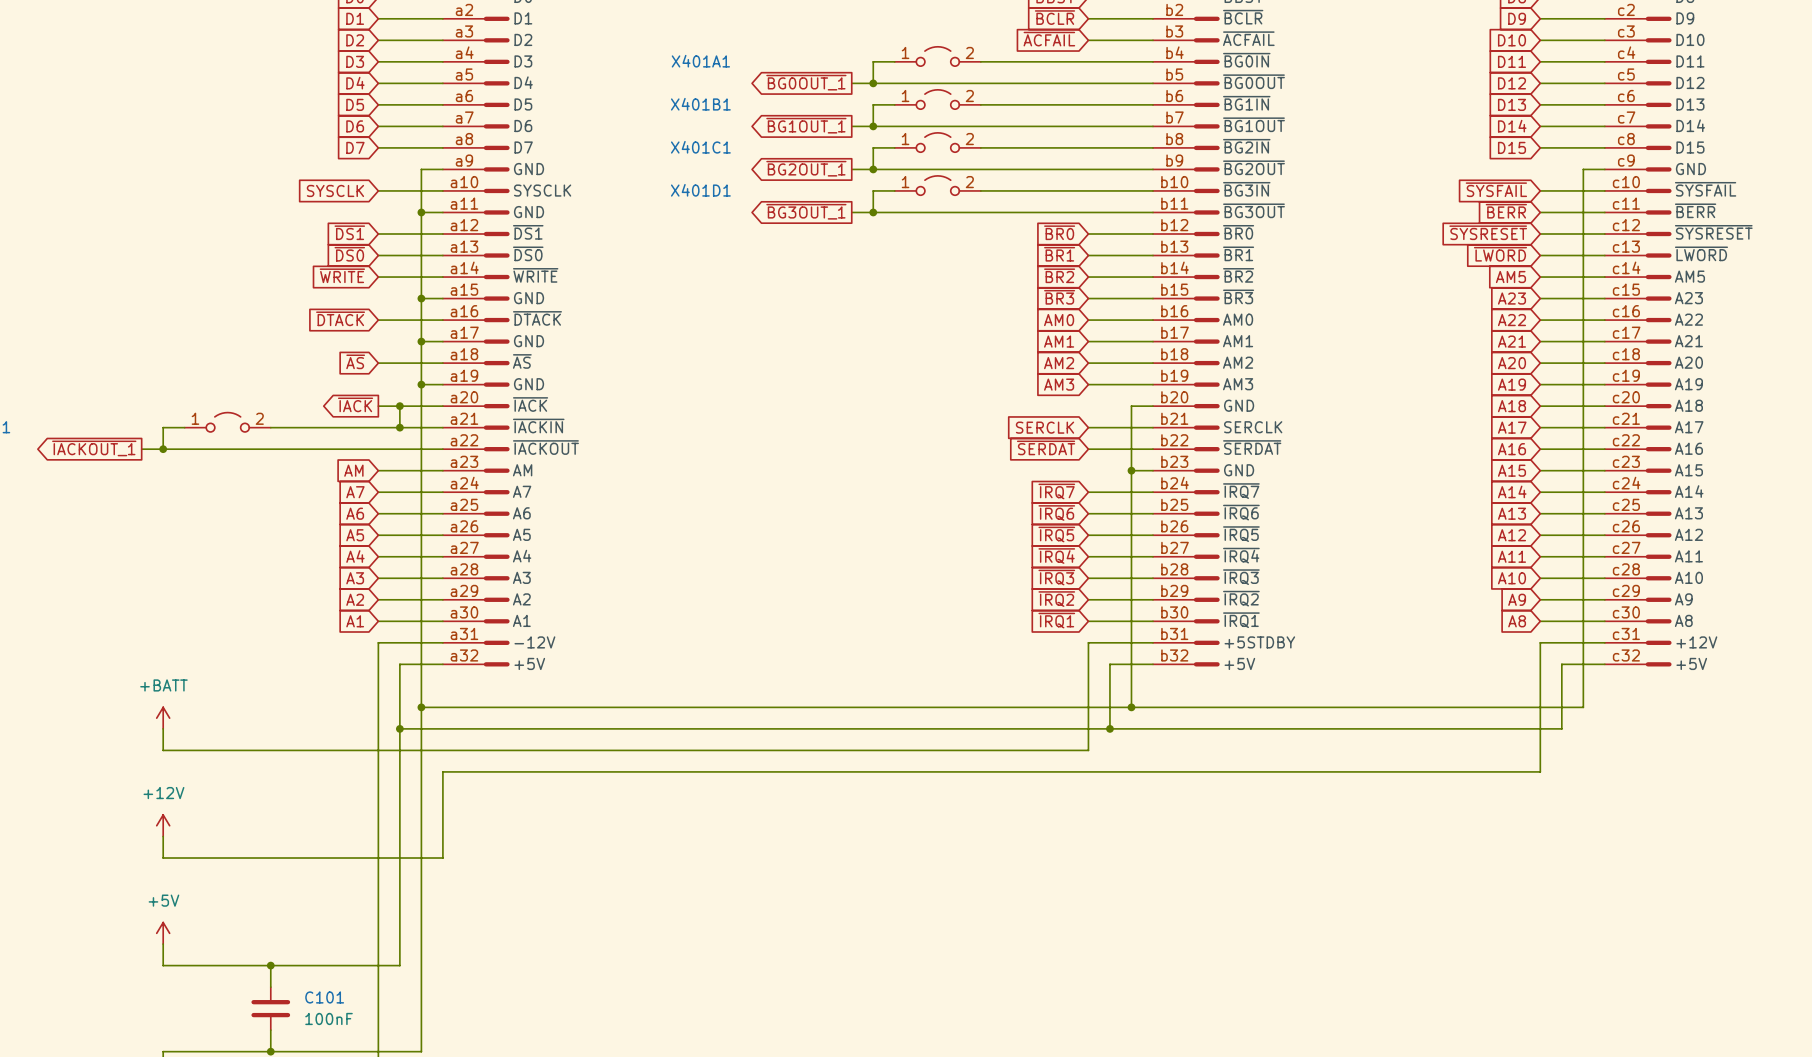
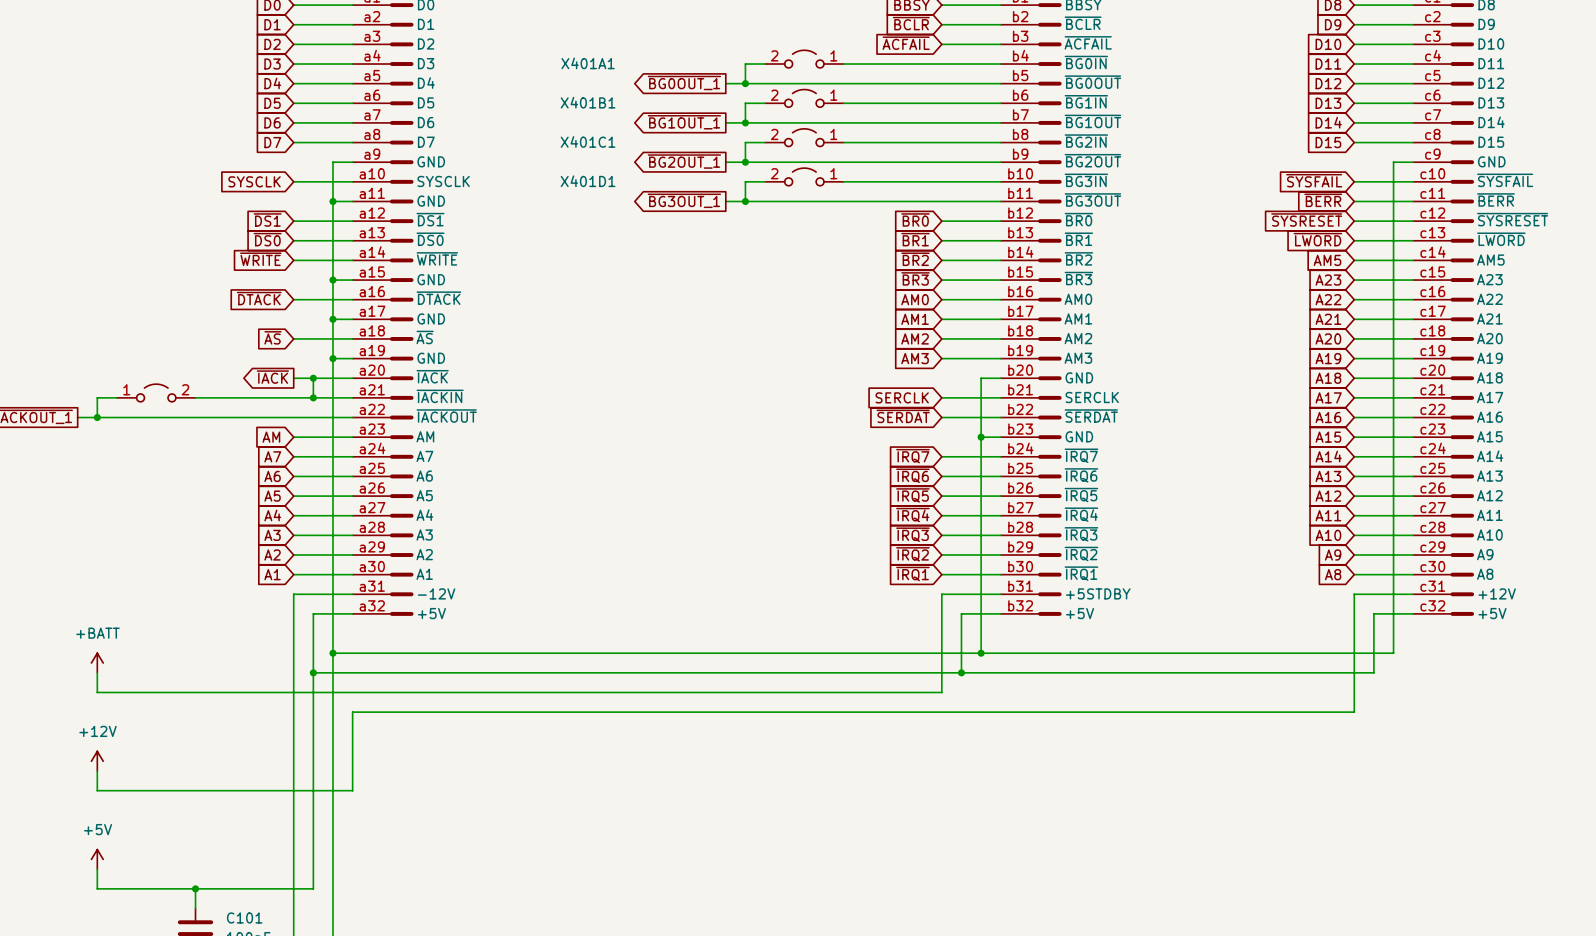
X401A1 flip: as is (937, 56) -> left-right (804, 59)
X401B1 flip: as is (937, 99) -> left-right (804, 98)
X401C1 flip: as is (937, 142) -> left-right (804, 137)
X401D1 flip: as is (937, 185) -> left-right (804, 176)

